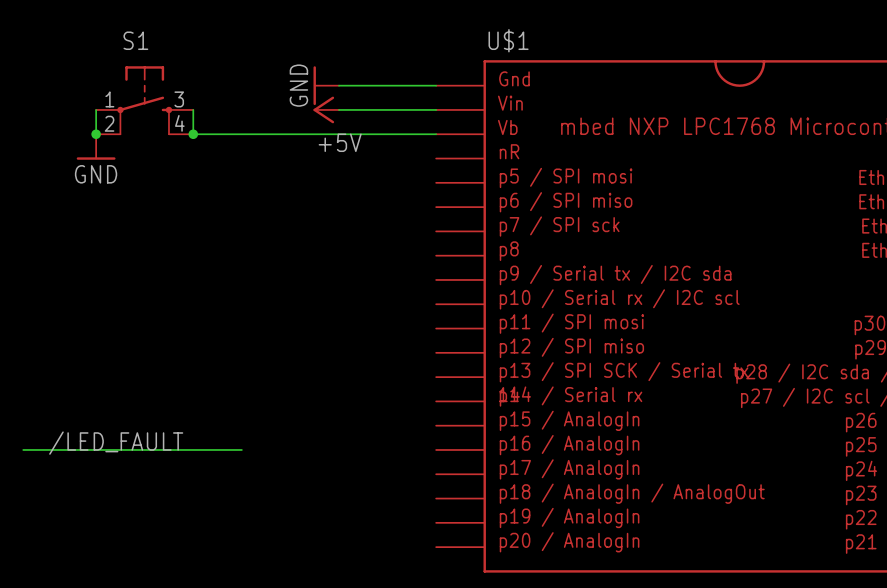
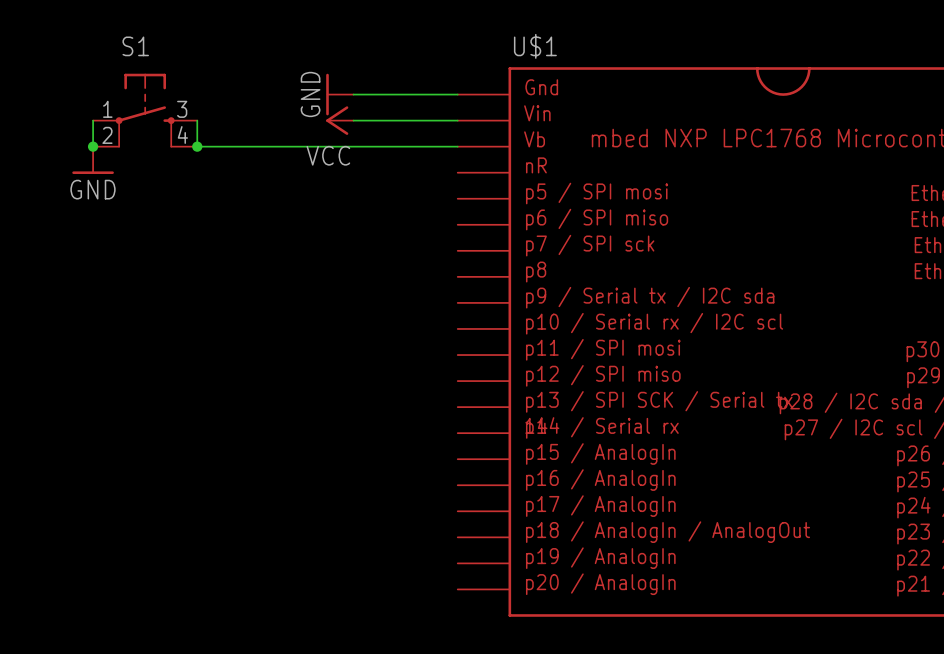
power symbol: +5V (326, 109) -> VCC (339, 120)
label: /LED_FAULT (116, 443) -> none
wire: (23, 449) (241, 449) -> none

